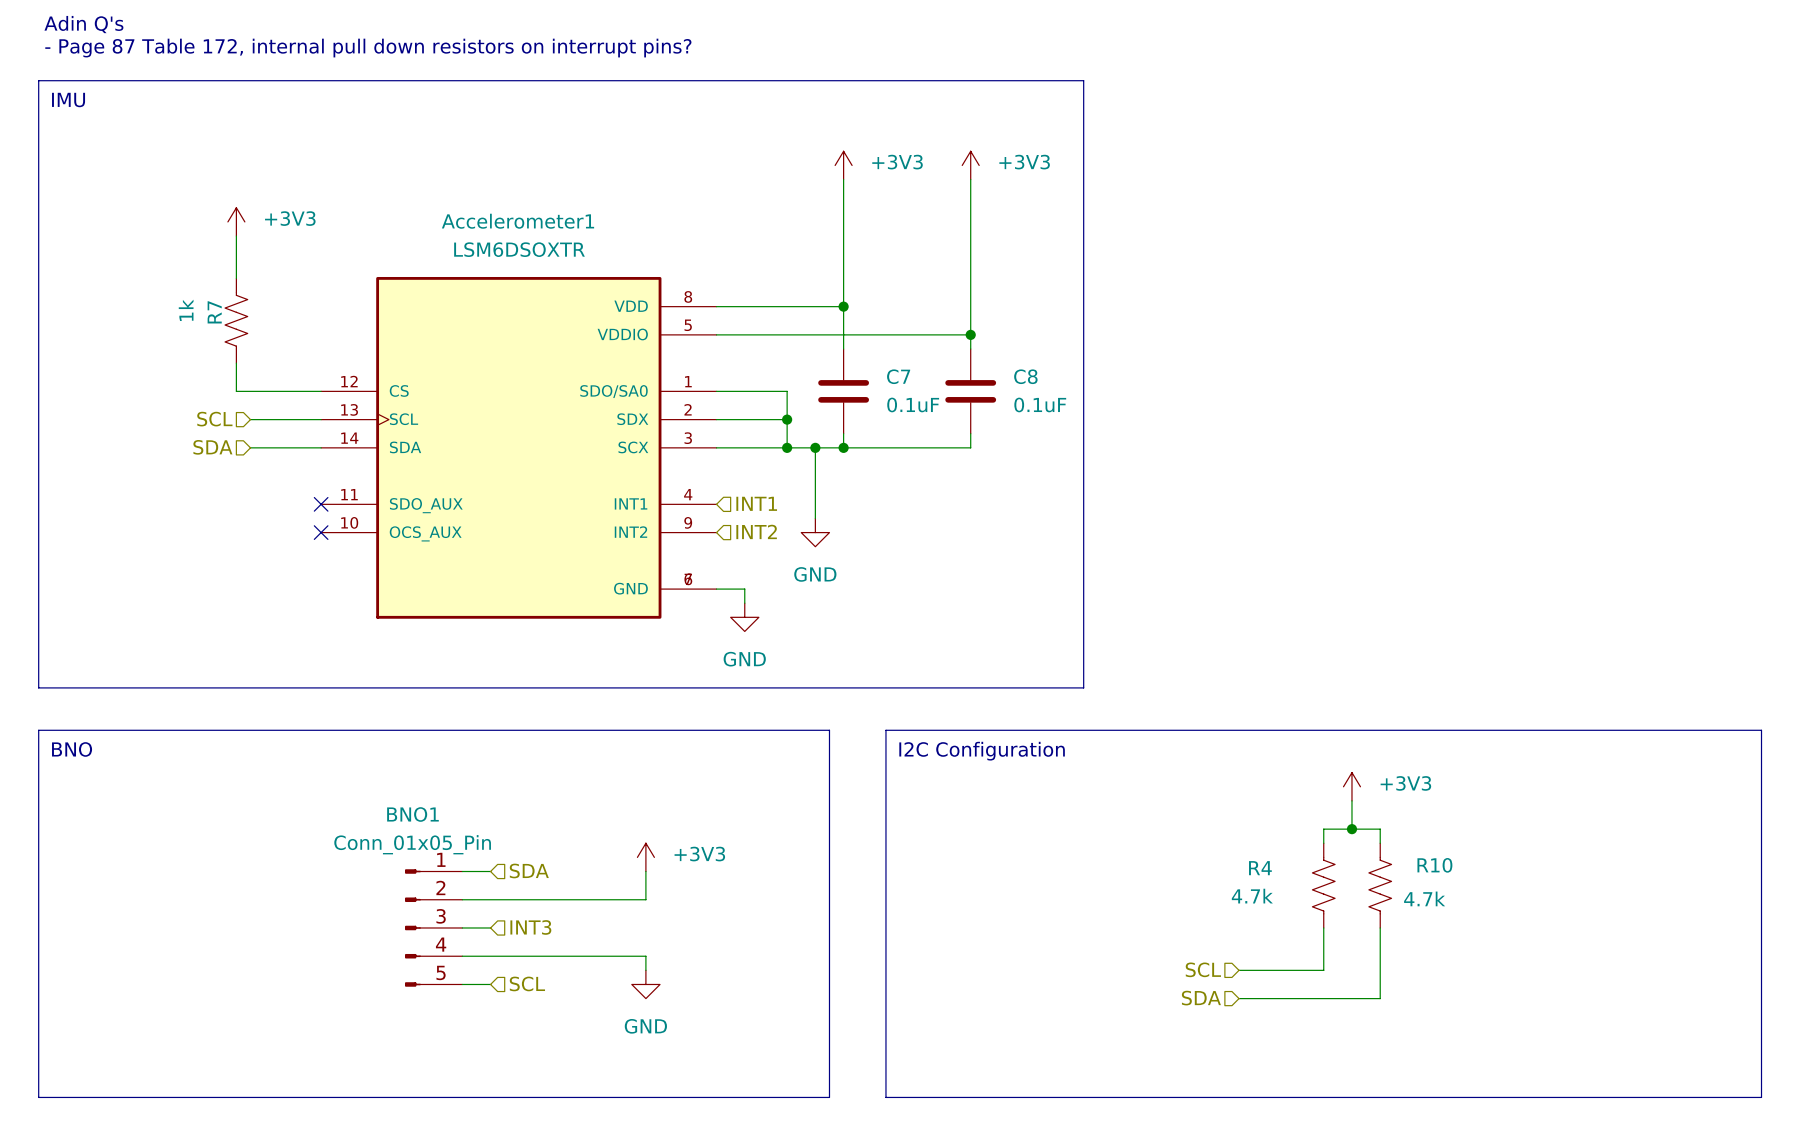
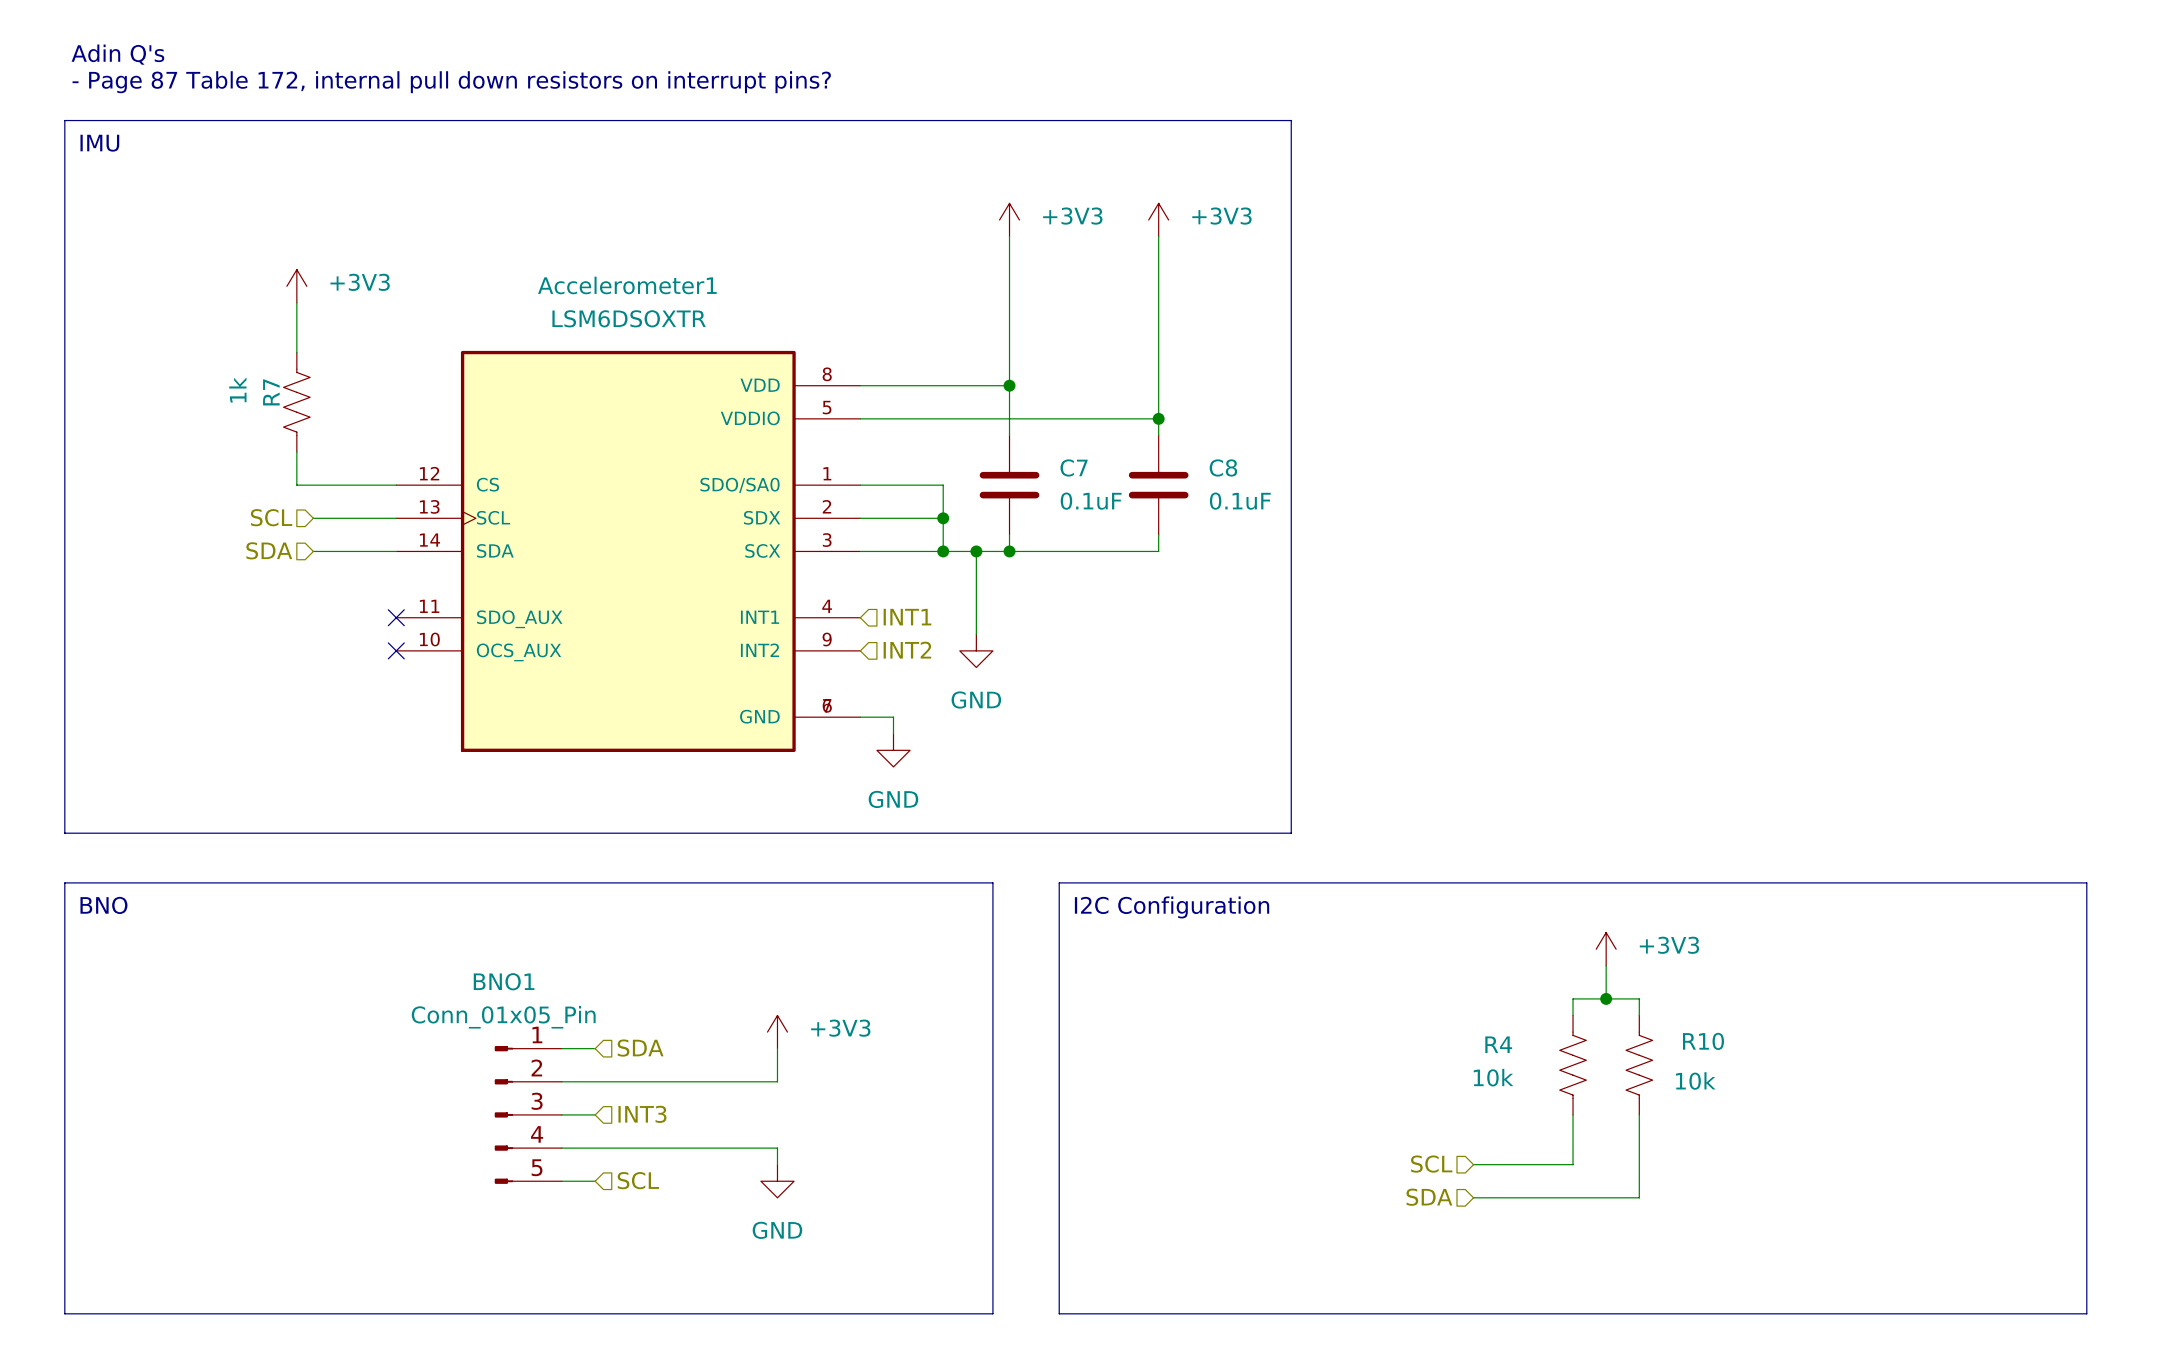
R4 value: 4.7k (1252, 896) -> 10k (1493, 1077)
R10 value: 4.7k (1424, 898) -> 10k (1695, 1080)

